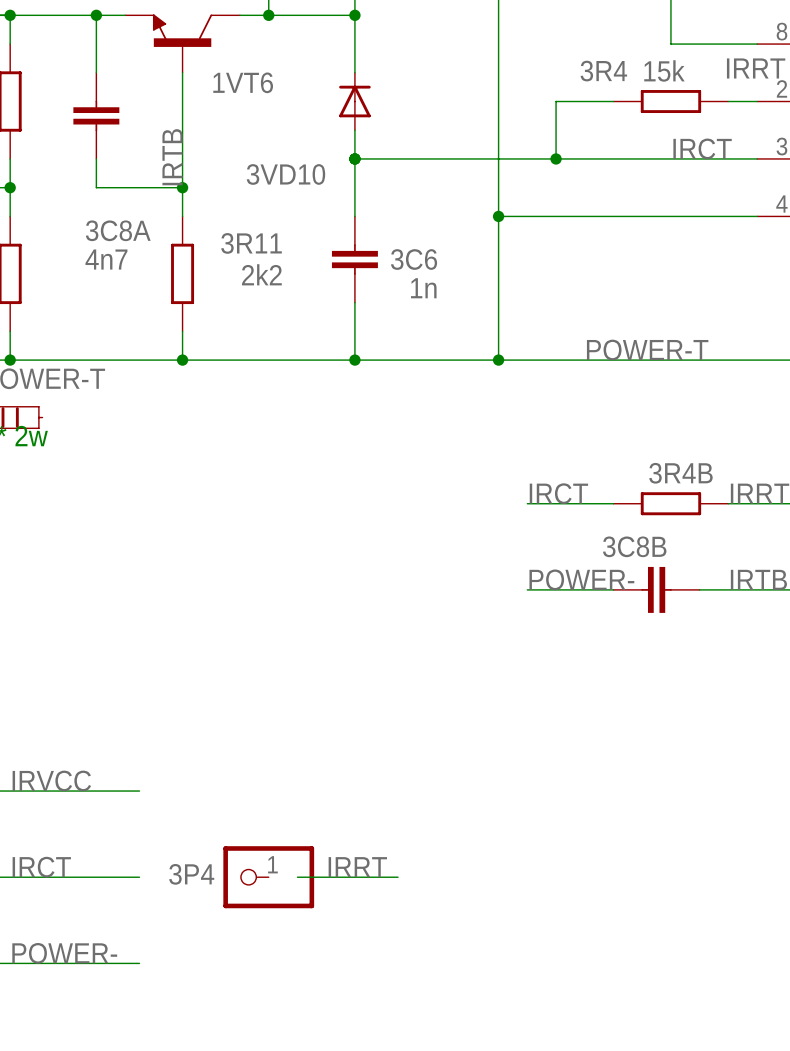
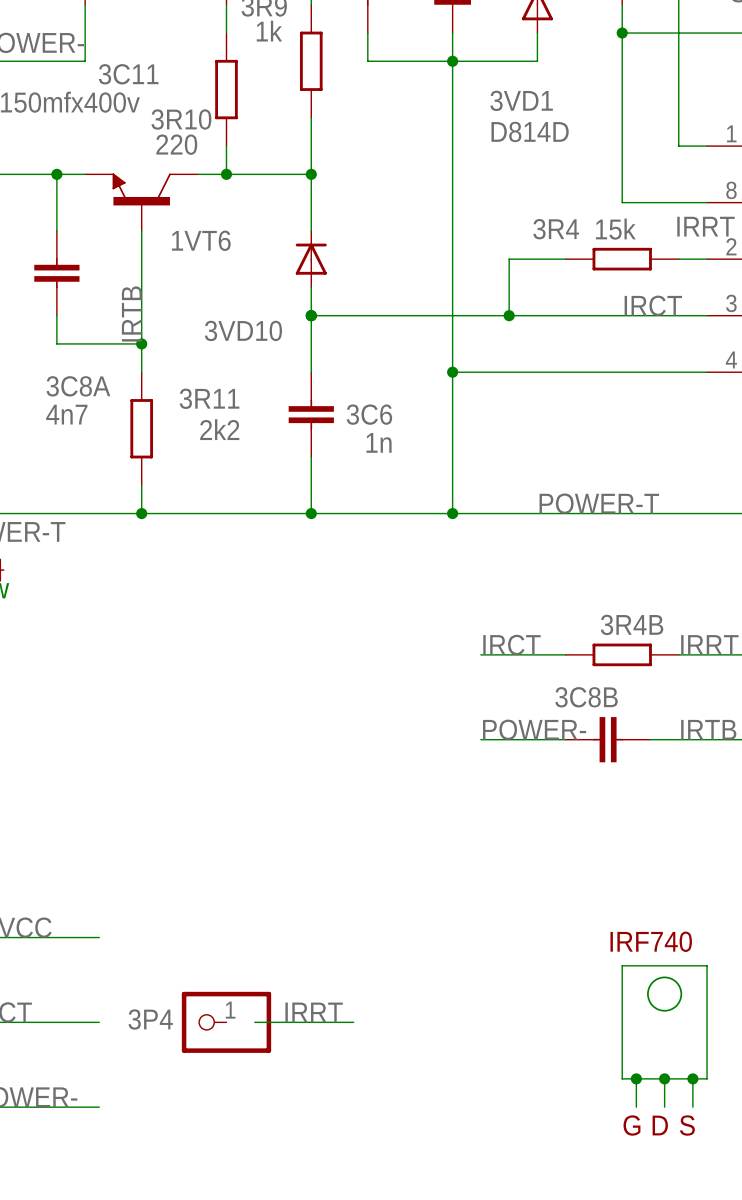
text: none -> IRF740 (651, 941)
wire: none -> (622, 965) (707, 965) (707, 1078) (622, 1078) (622, 965)
drawing: none -> [647, 976, 683, 1012]
wire: none -> (636, 1078) (636, 1107)
junction: none -> (636, 1078)
wire: none -> (664, 1078) (664, 1107)
junction: none -> (664, 1078)
wire: none -> (692, 1078) (692, 1107)
junction: none -> (692, 1078)
text: none -> G (631, 1125)
text: none -> D (660, 1125)
text: none -> S (687, 1125)

